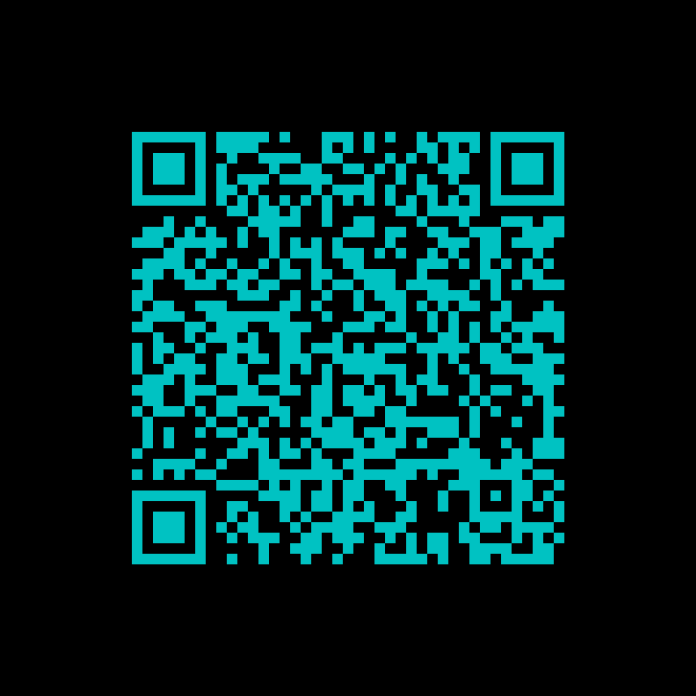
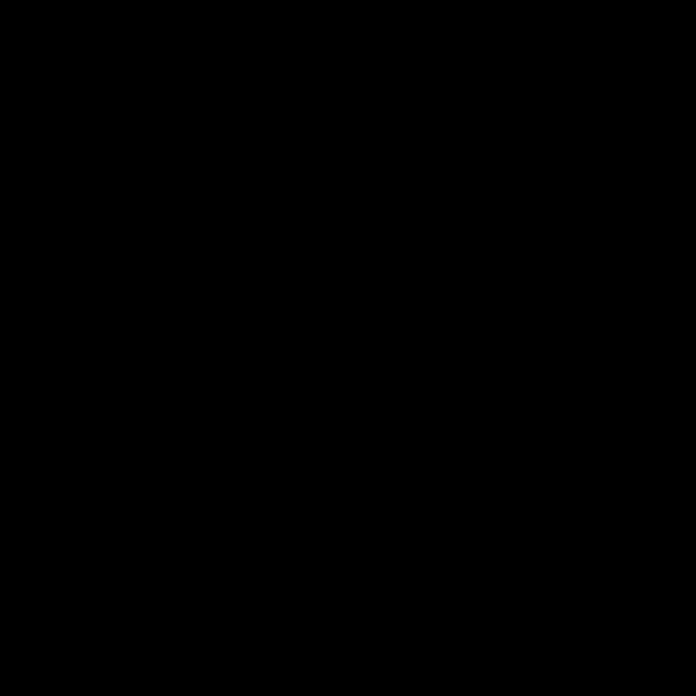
drawing: [131, 131, 565, 565] -> none

